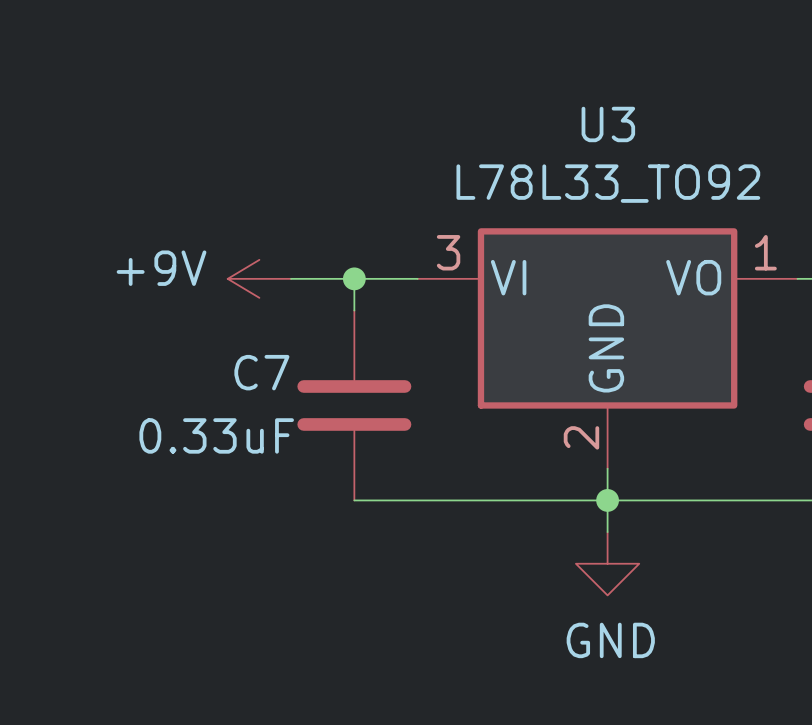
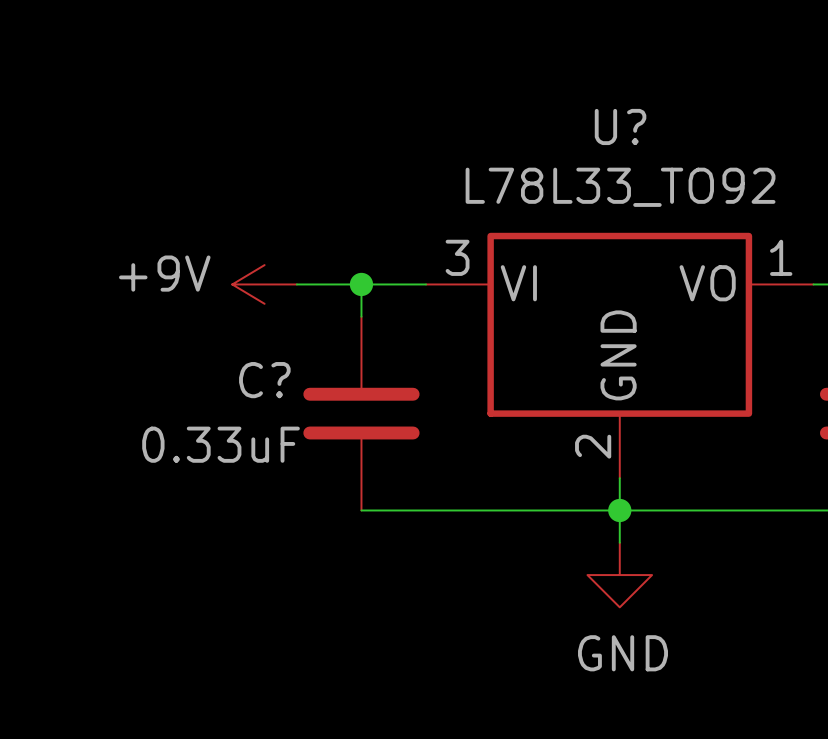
U3 name: U3 (608, 124) -> U? (620, 126)
C7 name: C7 (261, 372) -> C? (264, 380)

